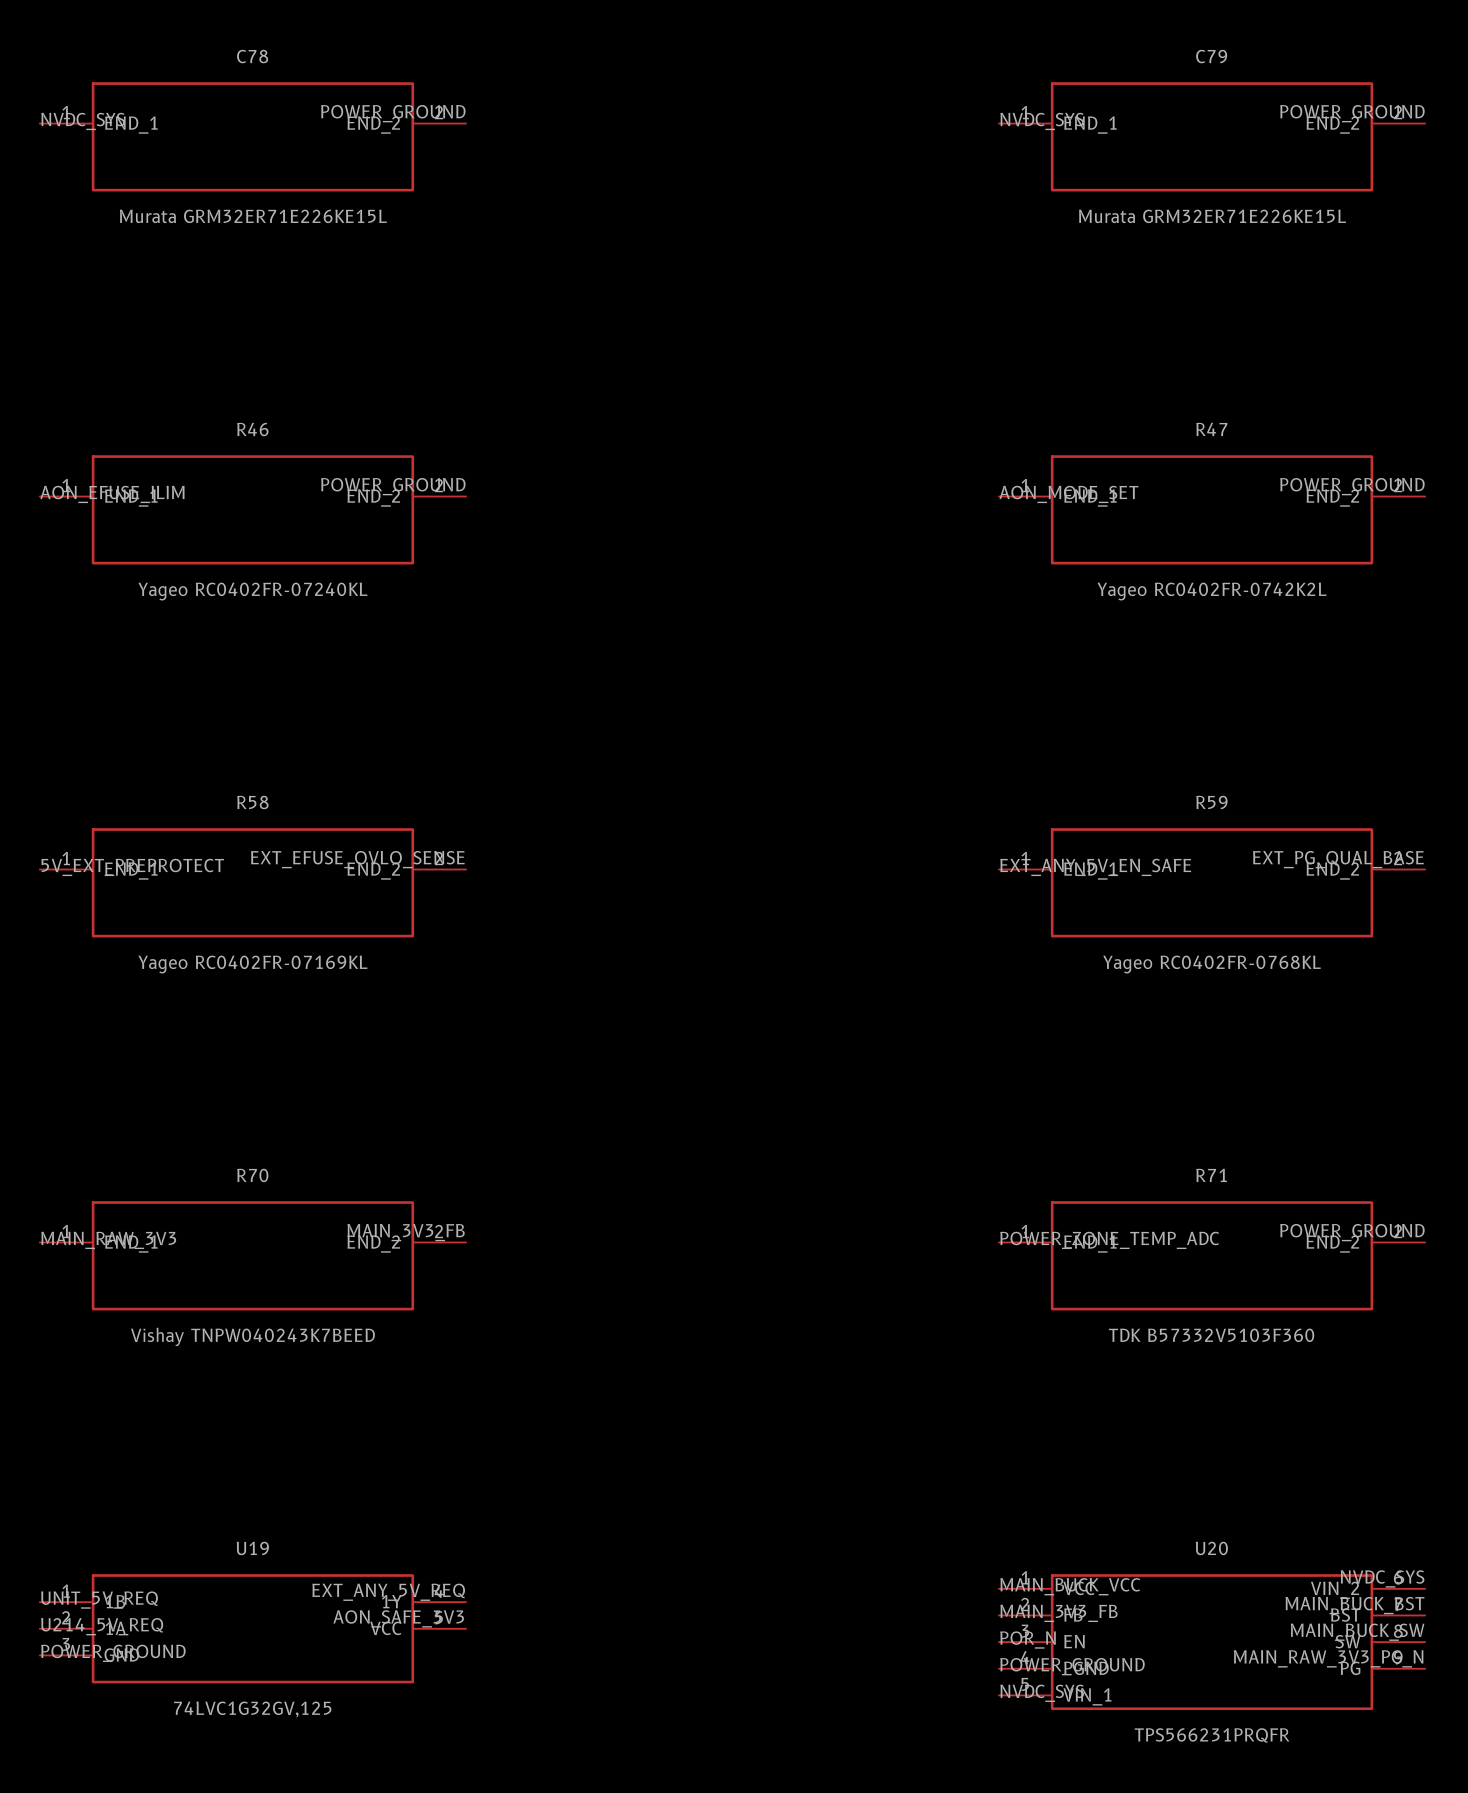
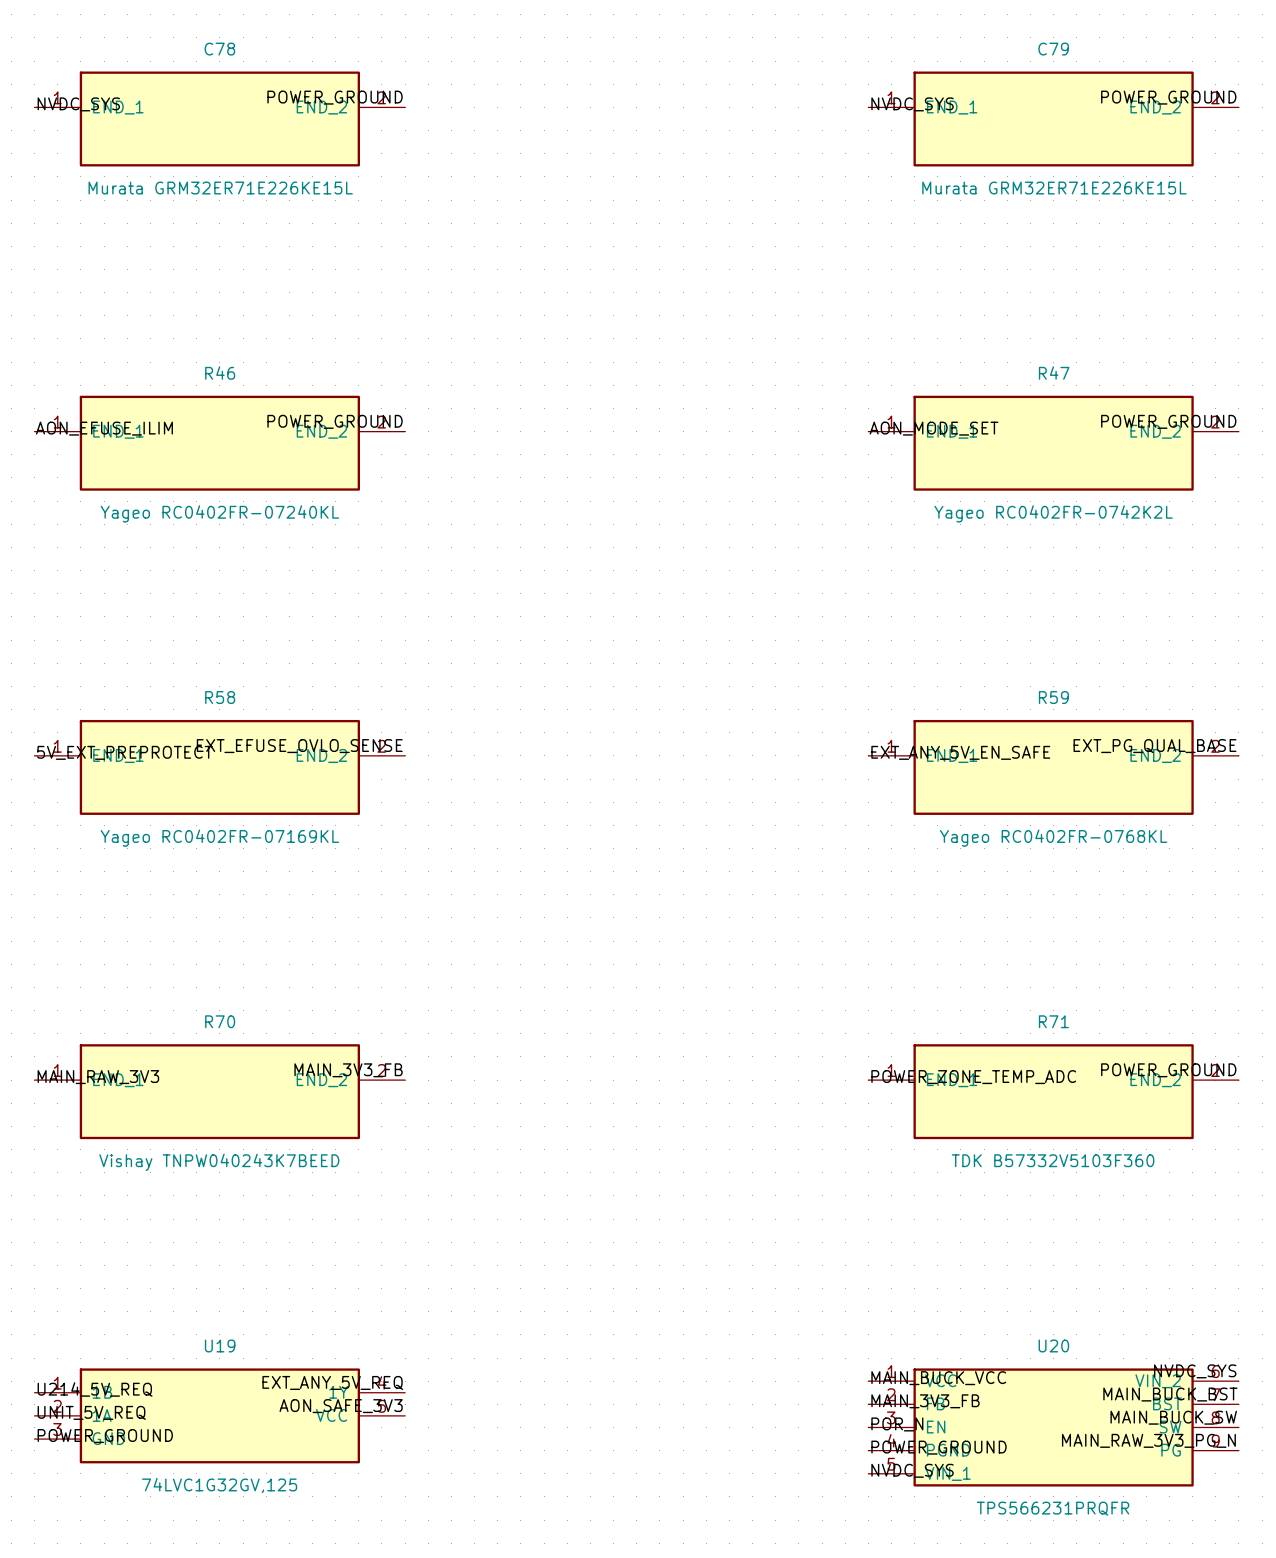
label: UNIT_5V_REQ (99, 1600) -> U214_5V_REQ (95, 1389)
label: U214_5V_REQ (102, 1626) -> UNIT_5V_REQ (91, 1412)

